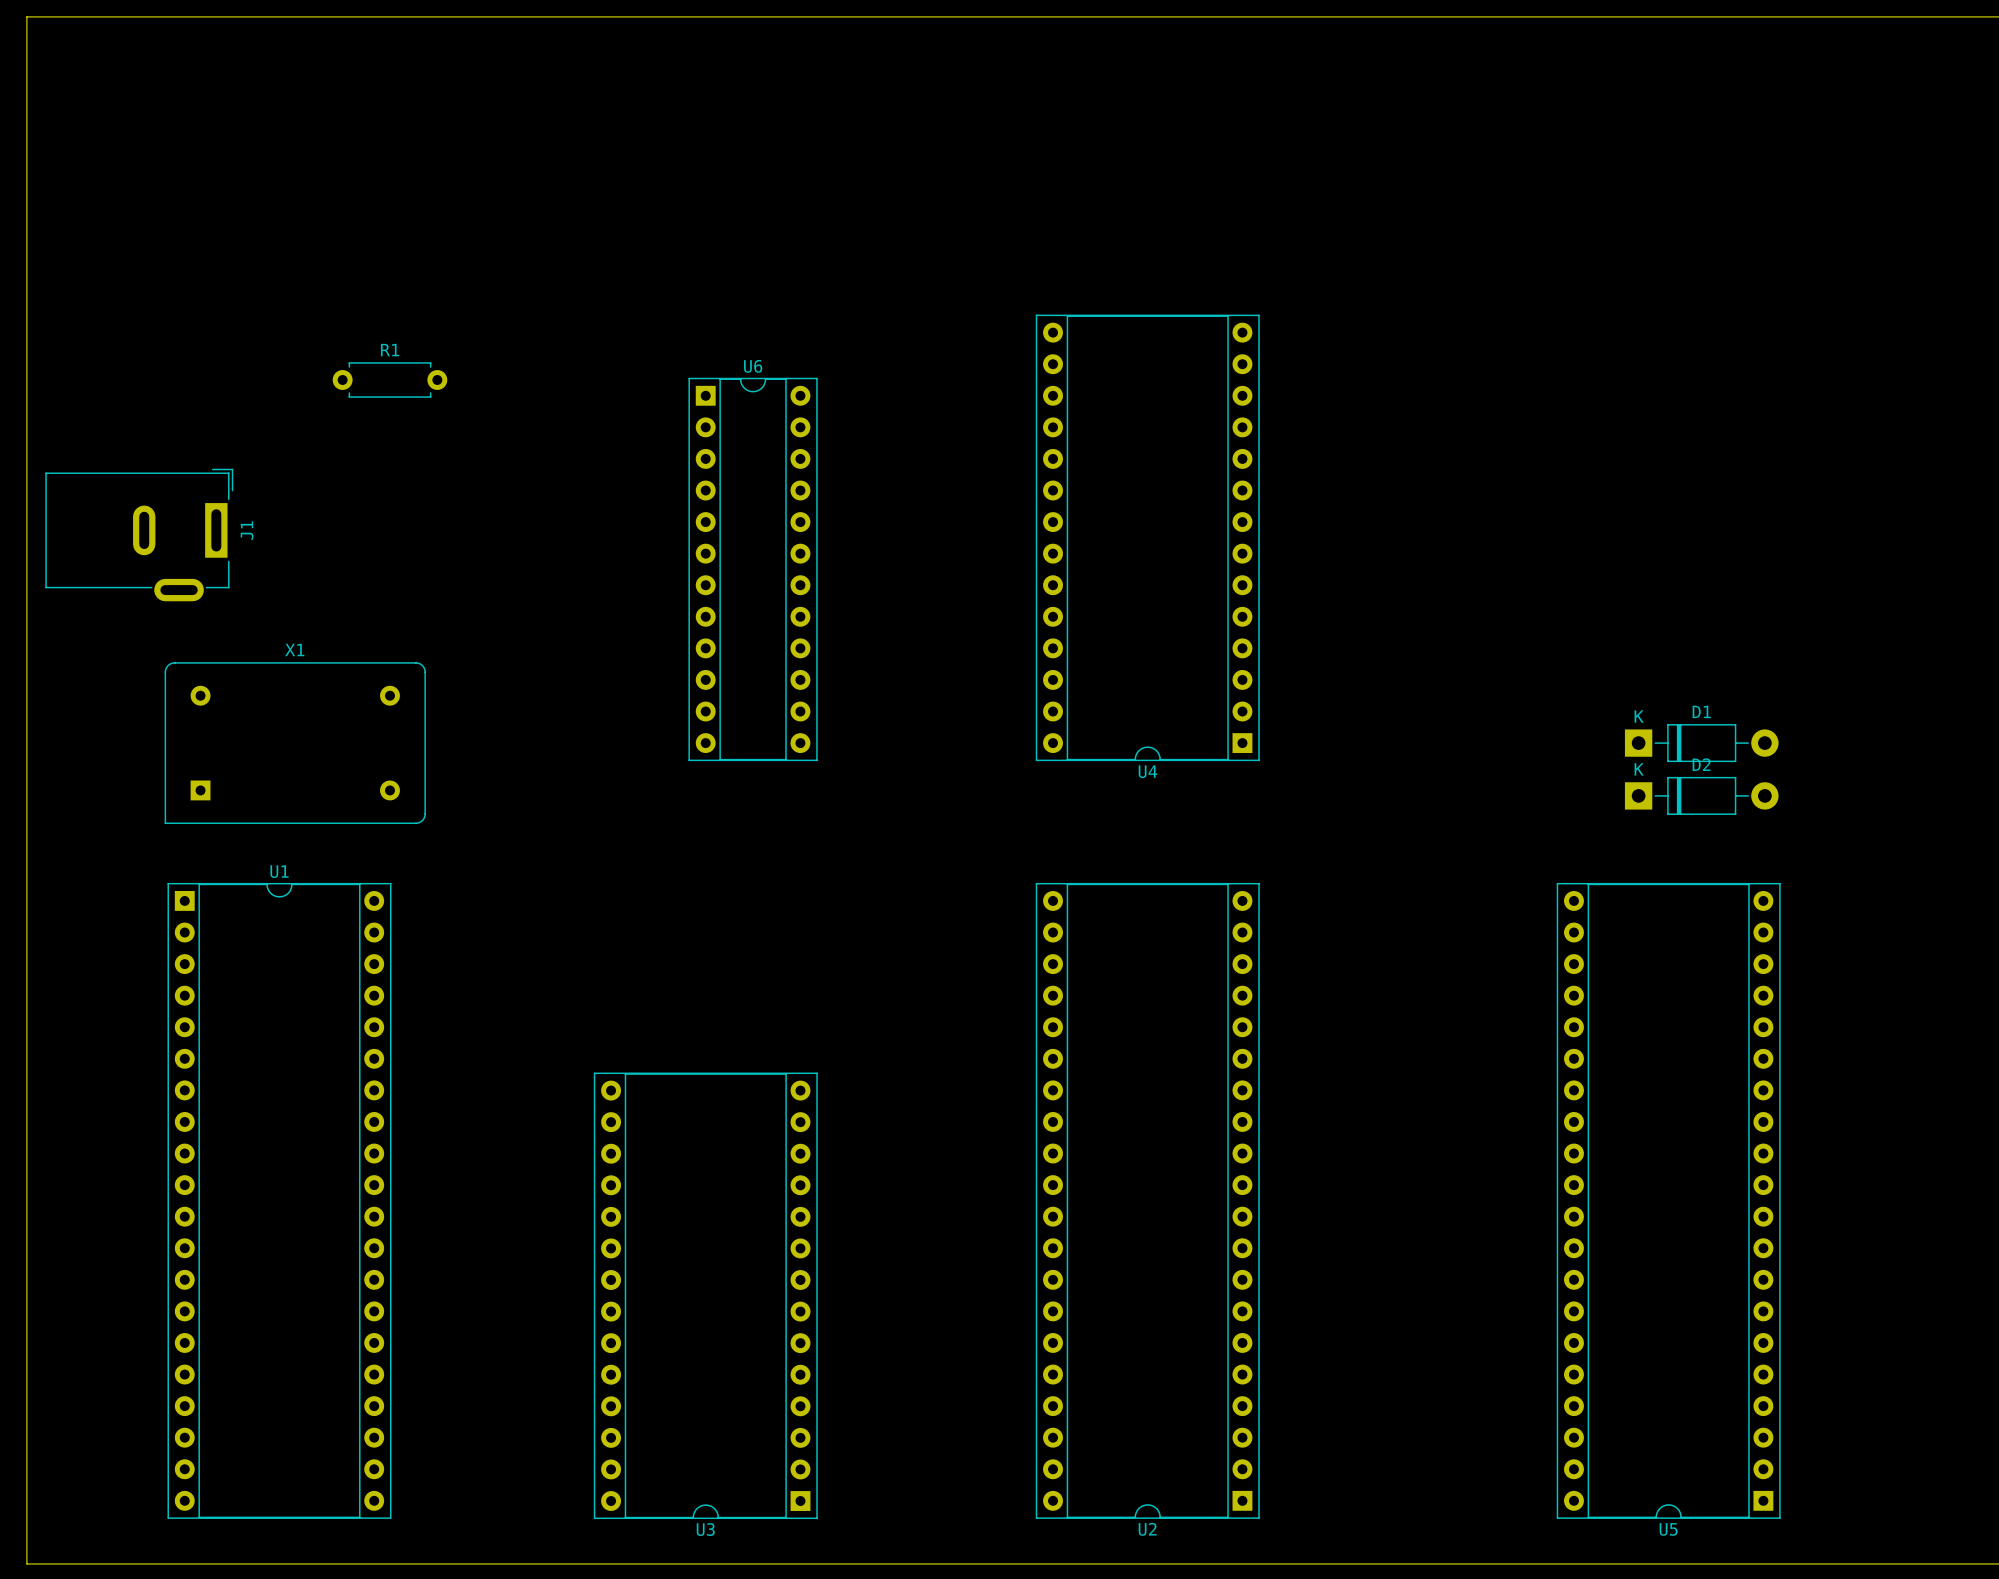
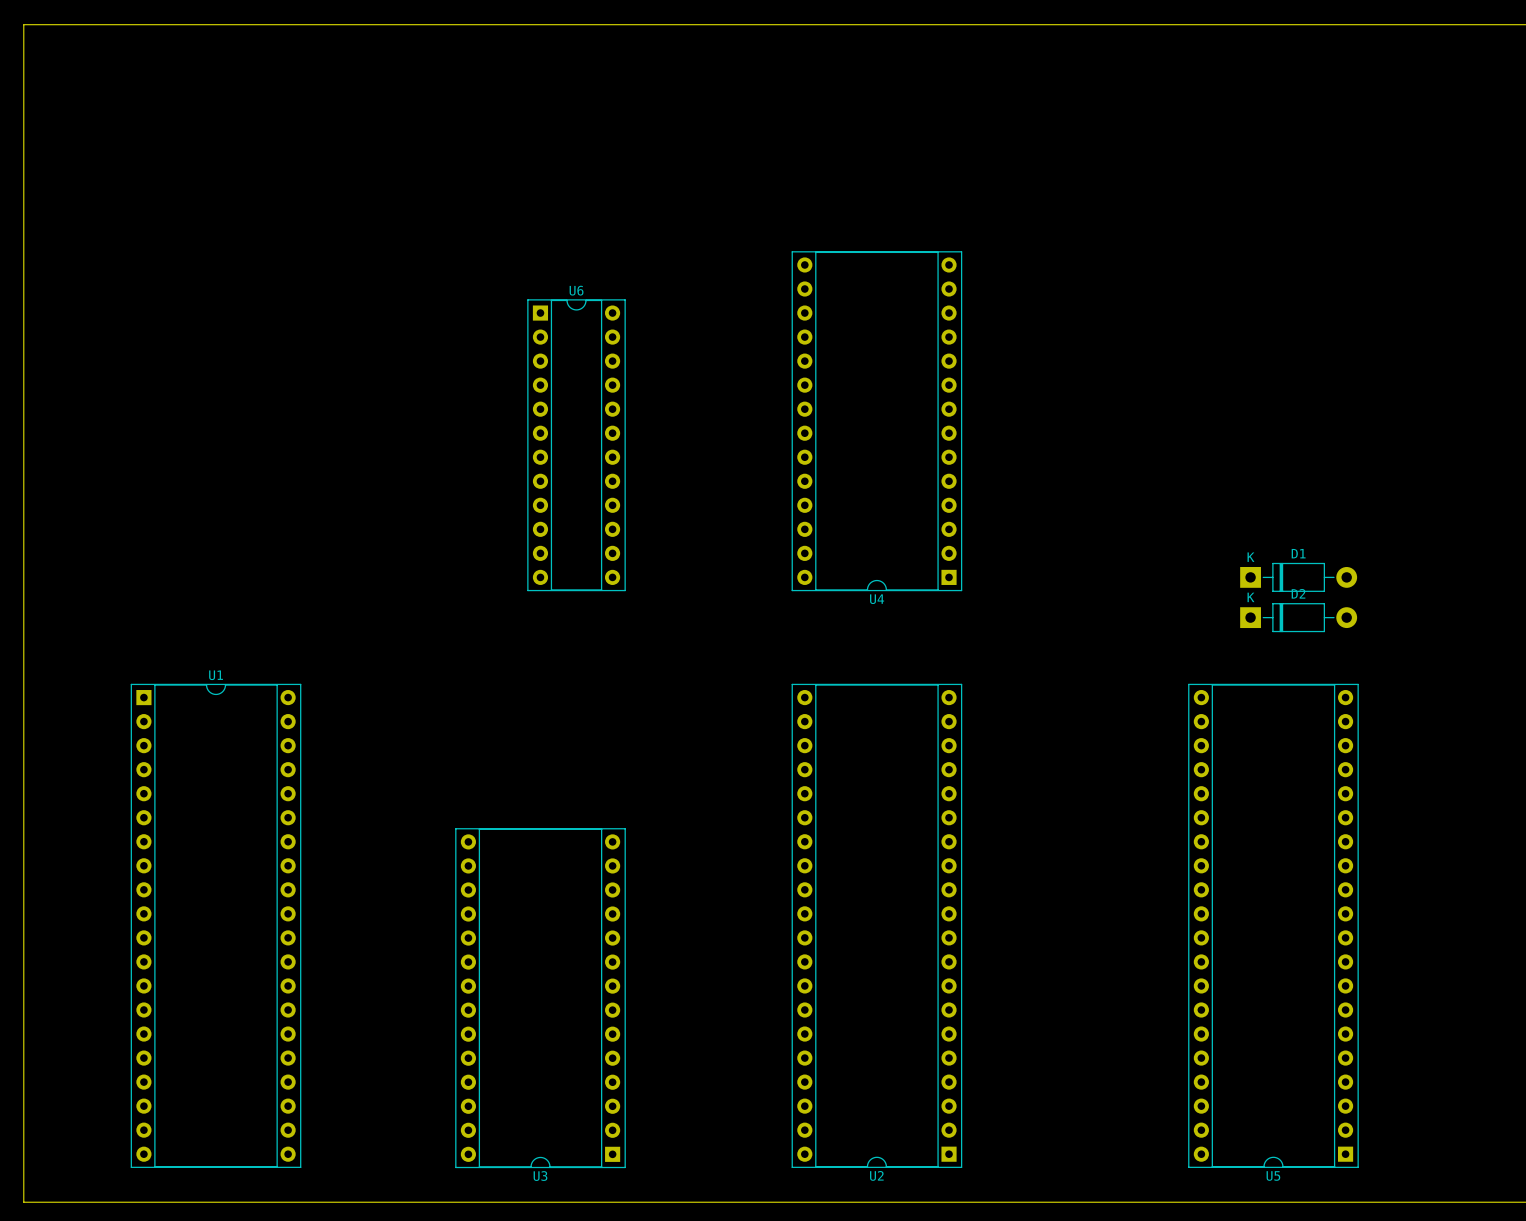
R1: (389, 380) -> none
J1: (139, 535) -> none
X1: (295, 743) -> none

